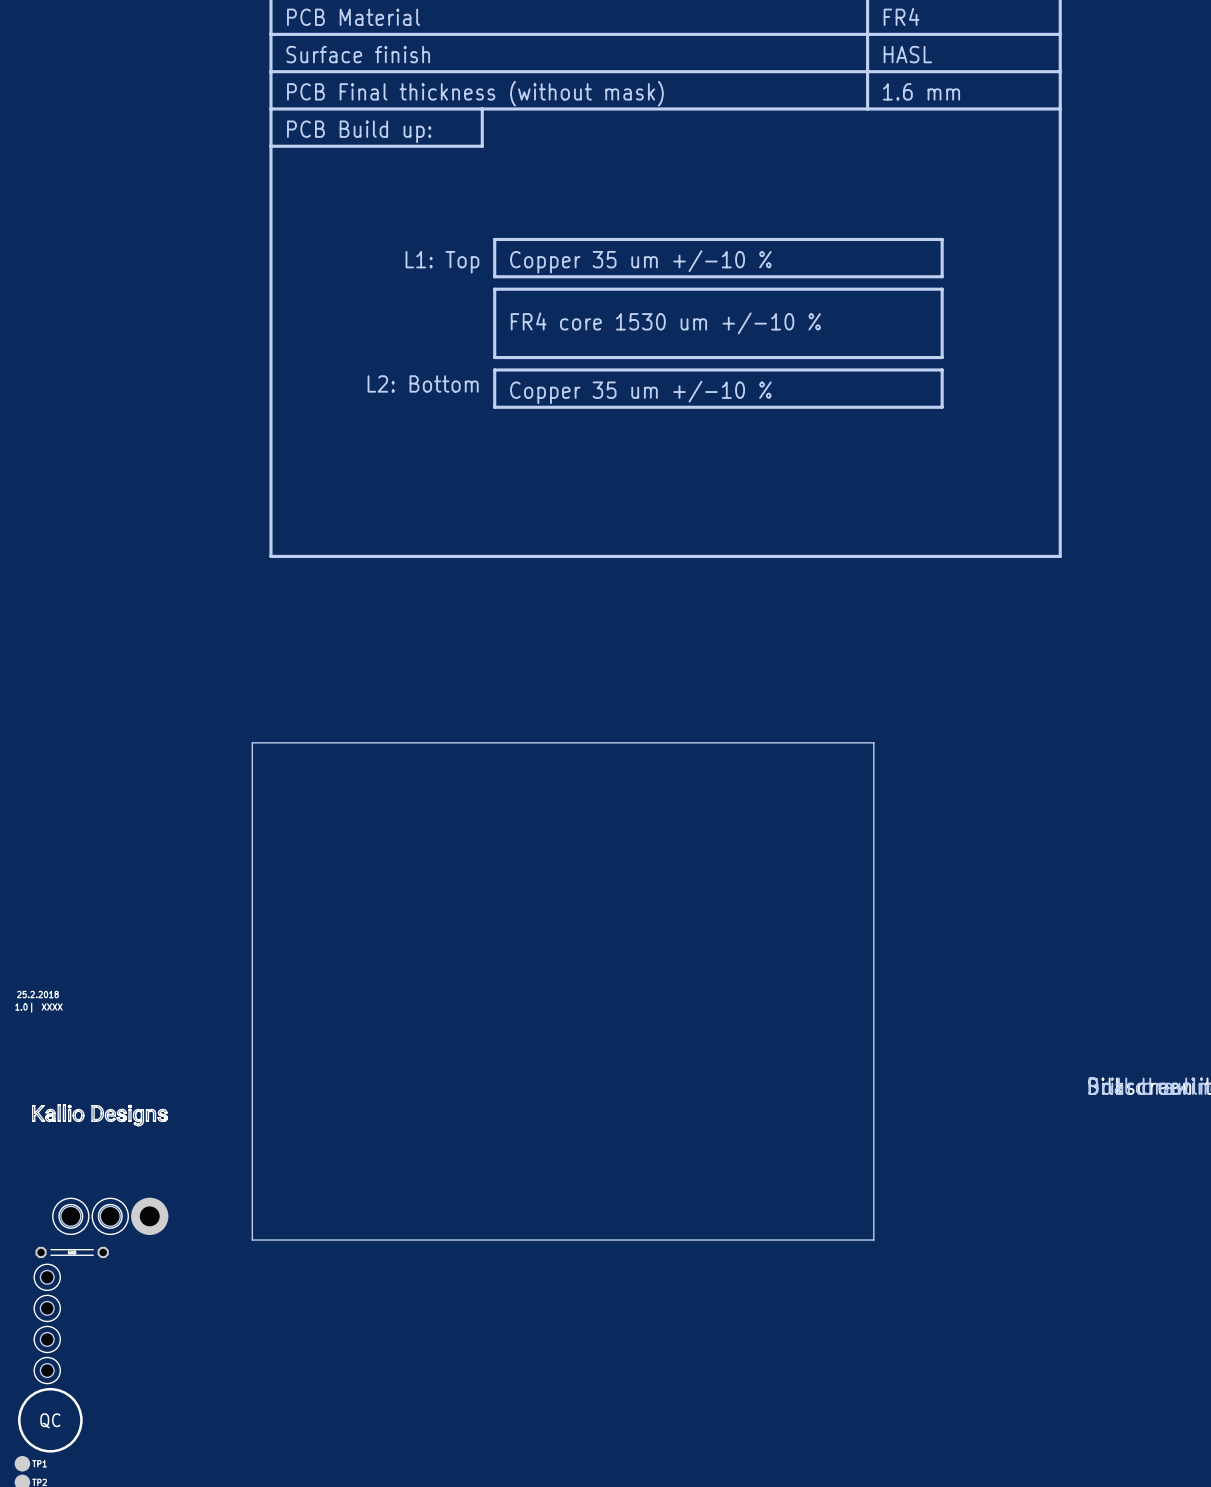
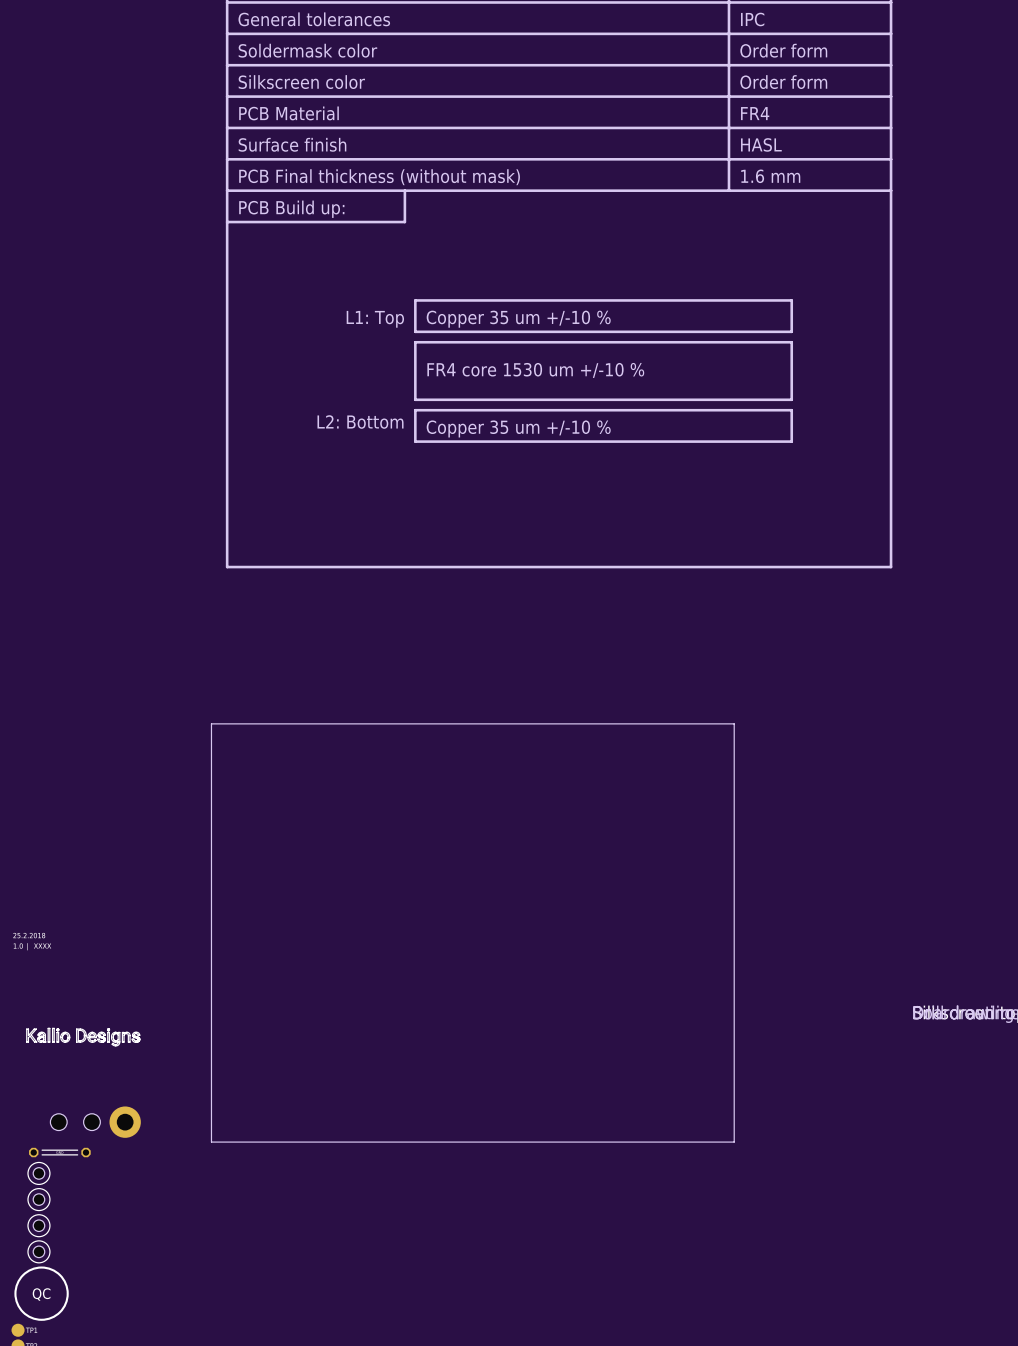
part footprint: [52, 1197, 90, 1235] -> [50, 1113, 68, 1131]
part footprint: [91, 1197, 129, 1235] -> [83, 1113, 101, 1131]

